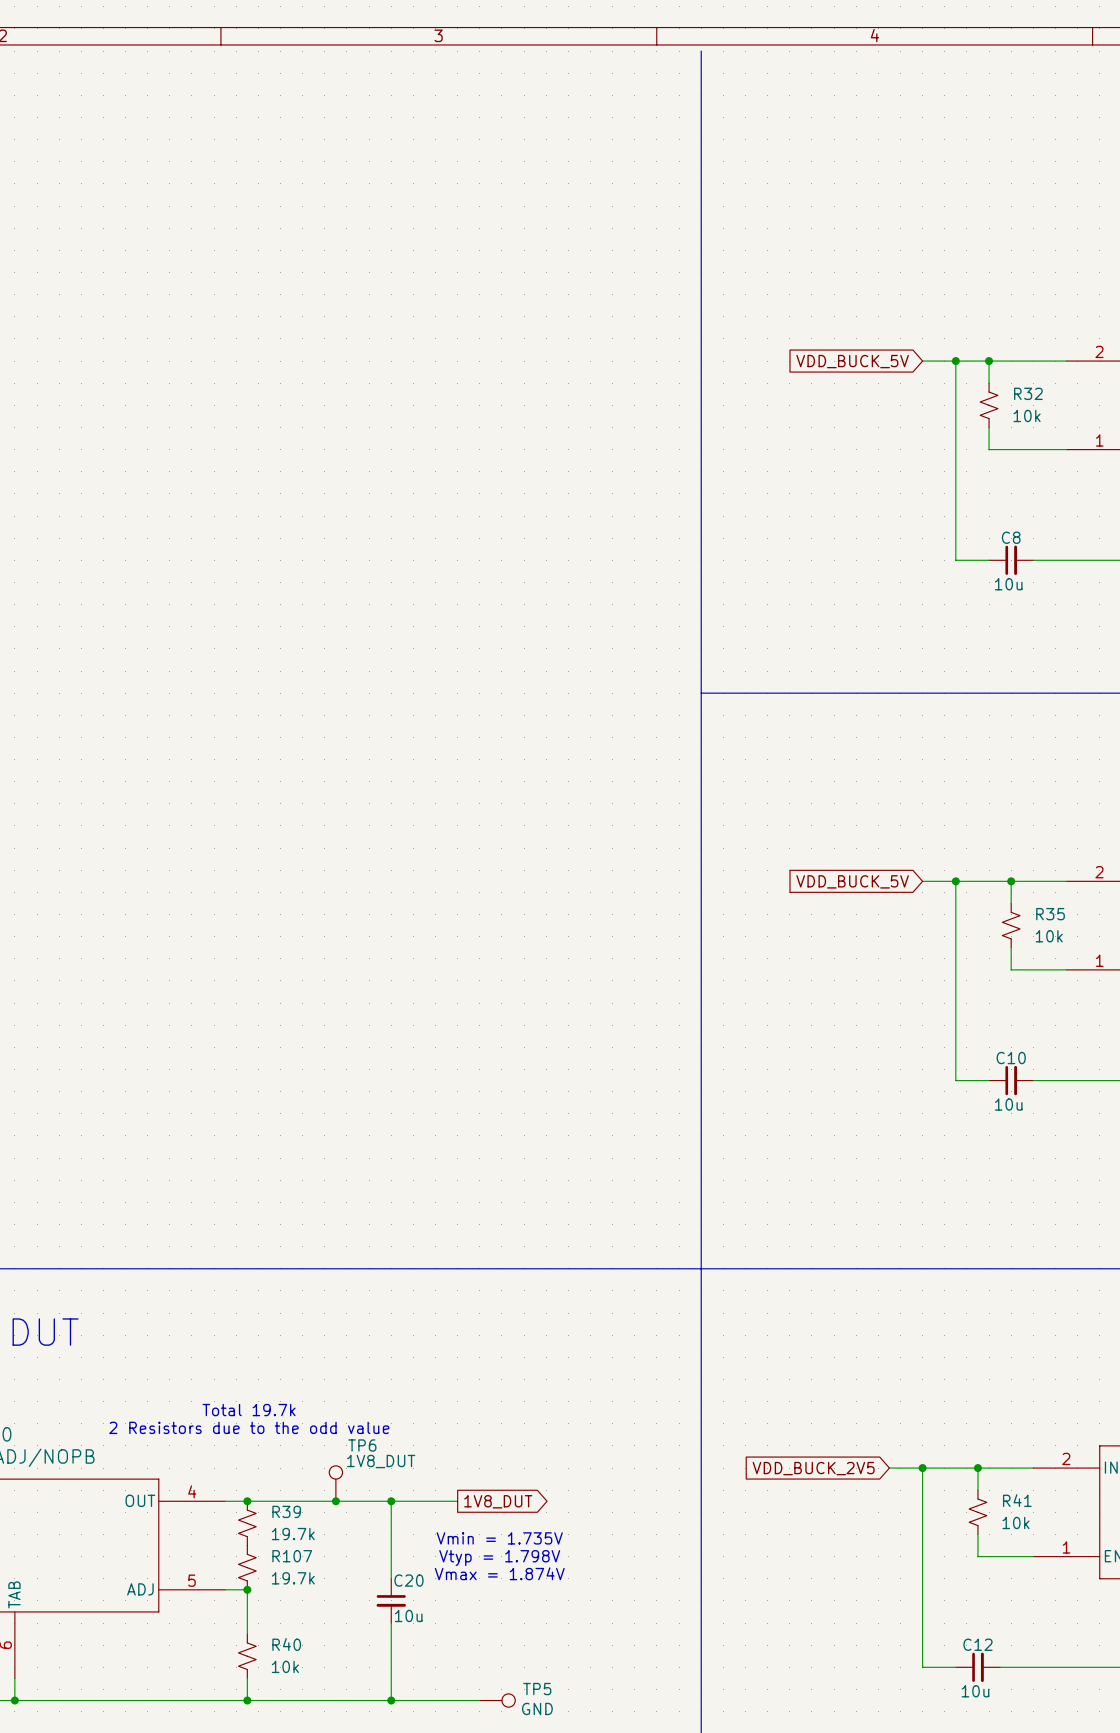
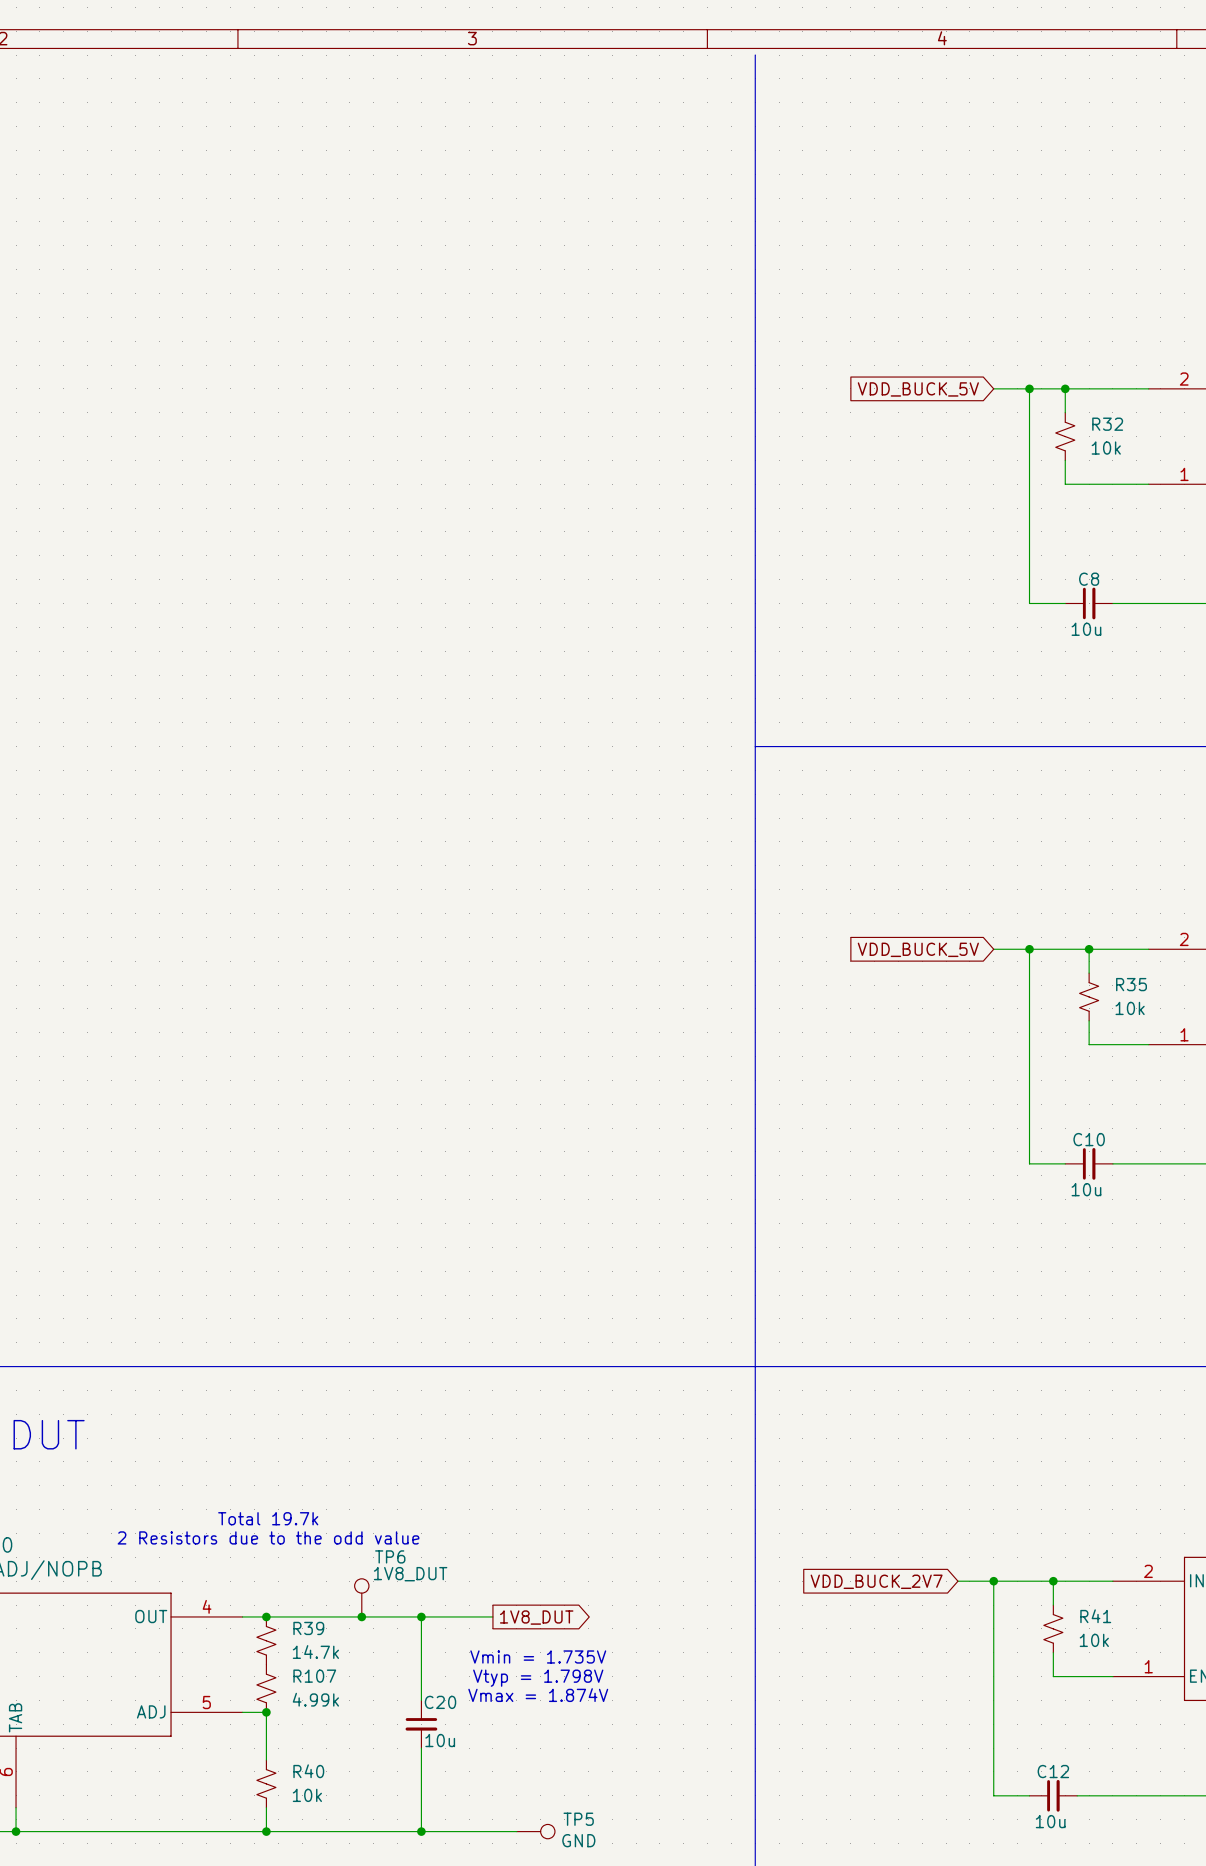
global label: VDD_BUCK_2V5 (813, 1468) -> VDD_BUCK_2V7 (876, 1581)
R39 value: 19.7k (293, 1534) -> 14.7k (315, 1652)
R107 value: 19.7k (293, 1578) -> 4.99k (315, 1699)

